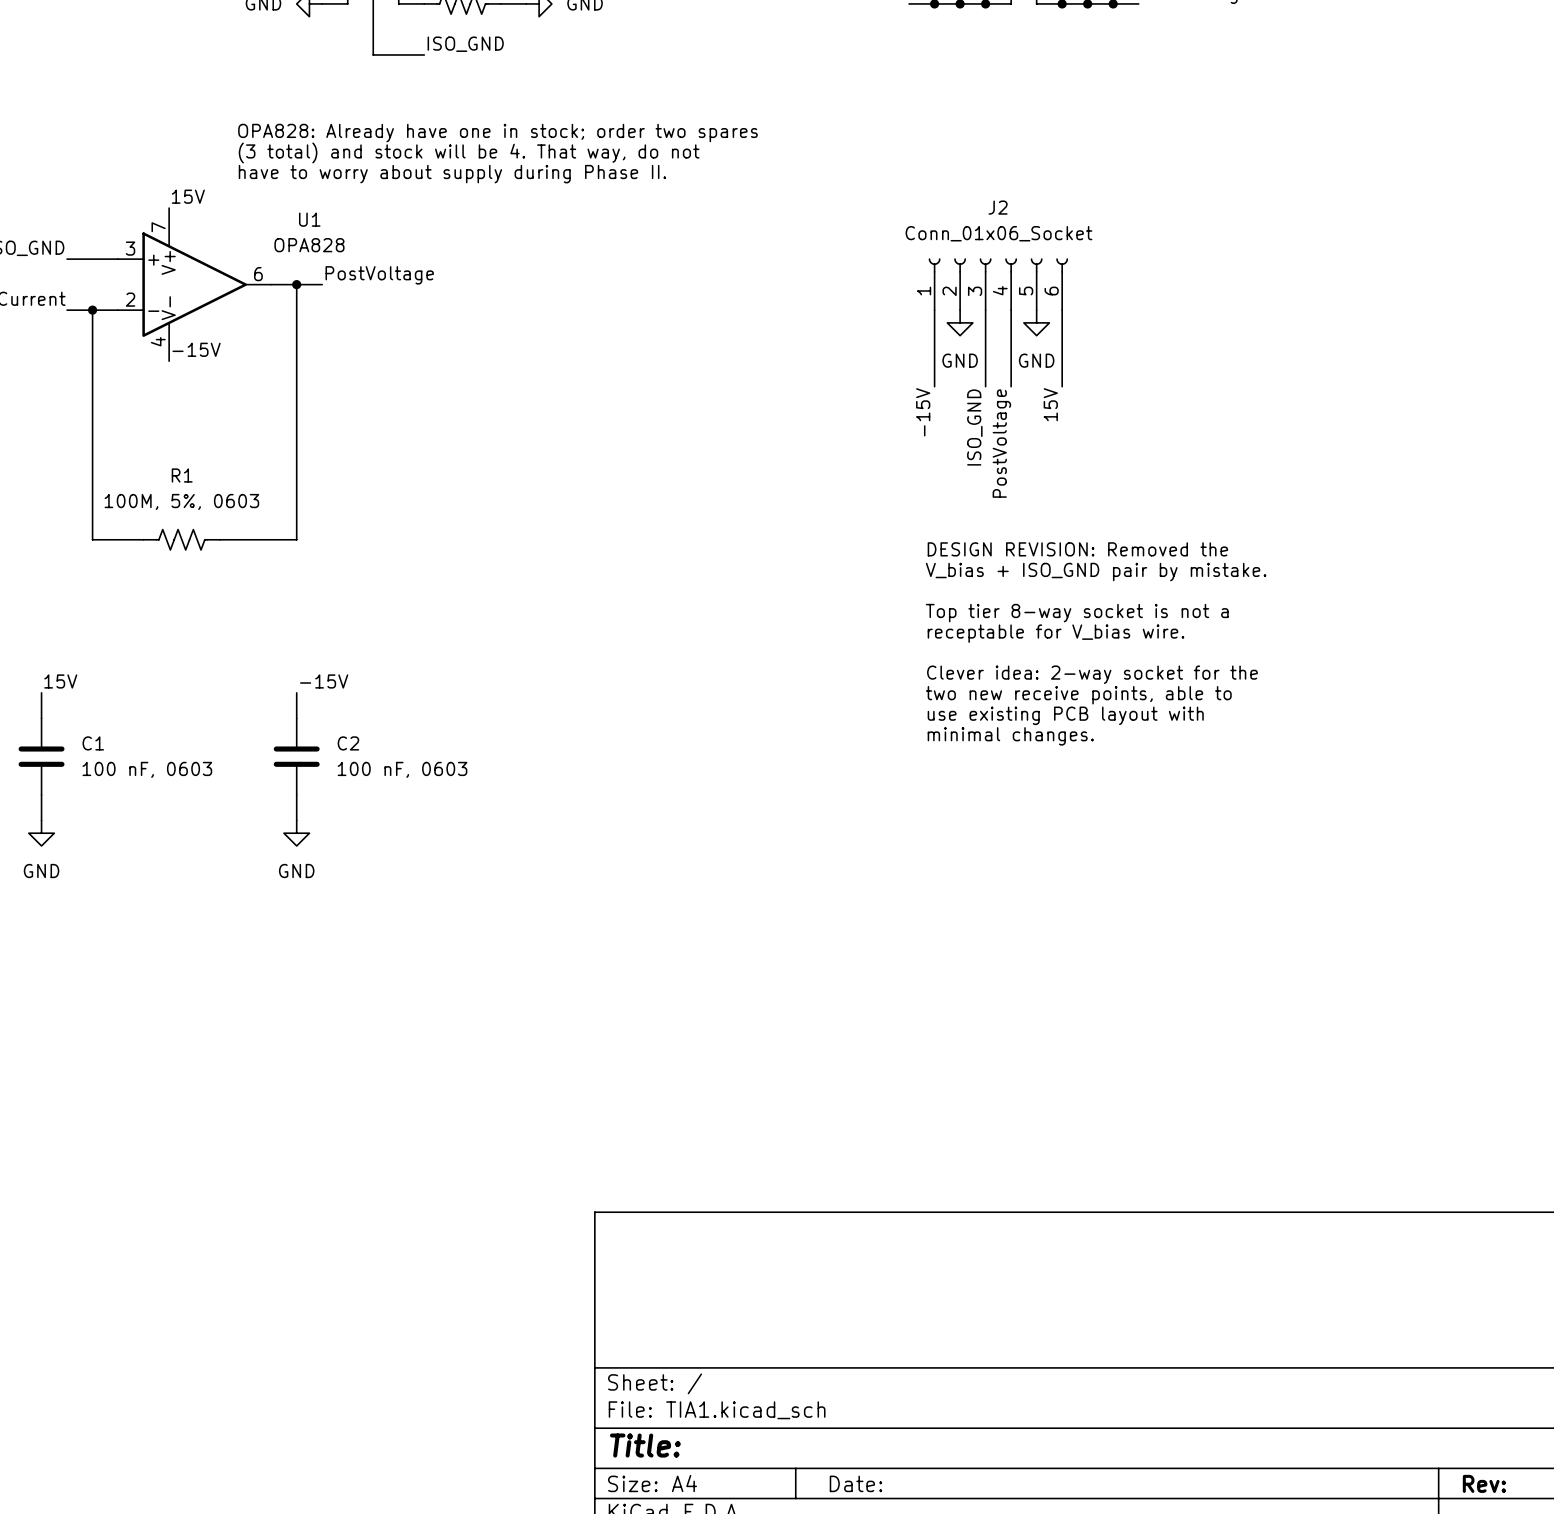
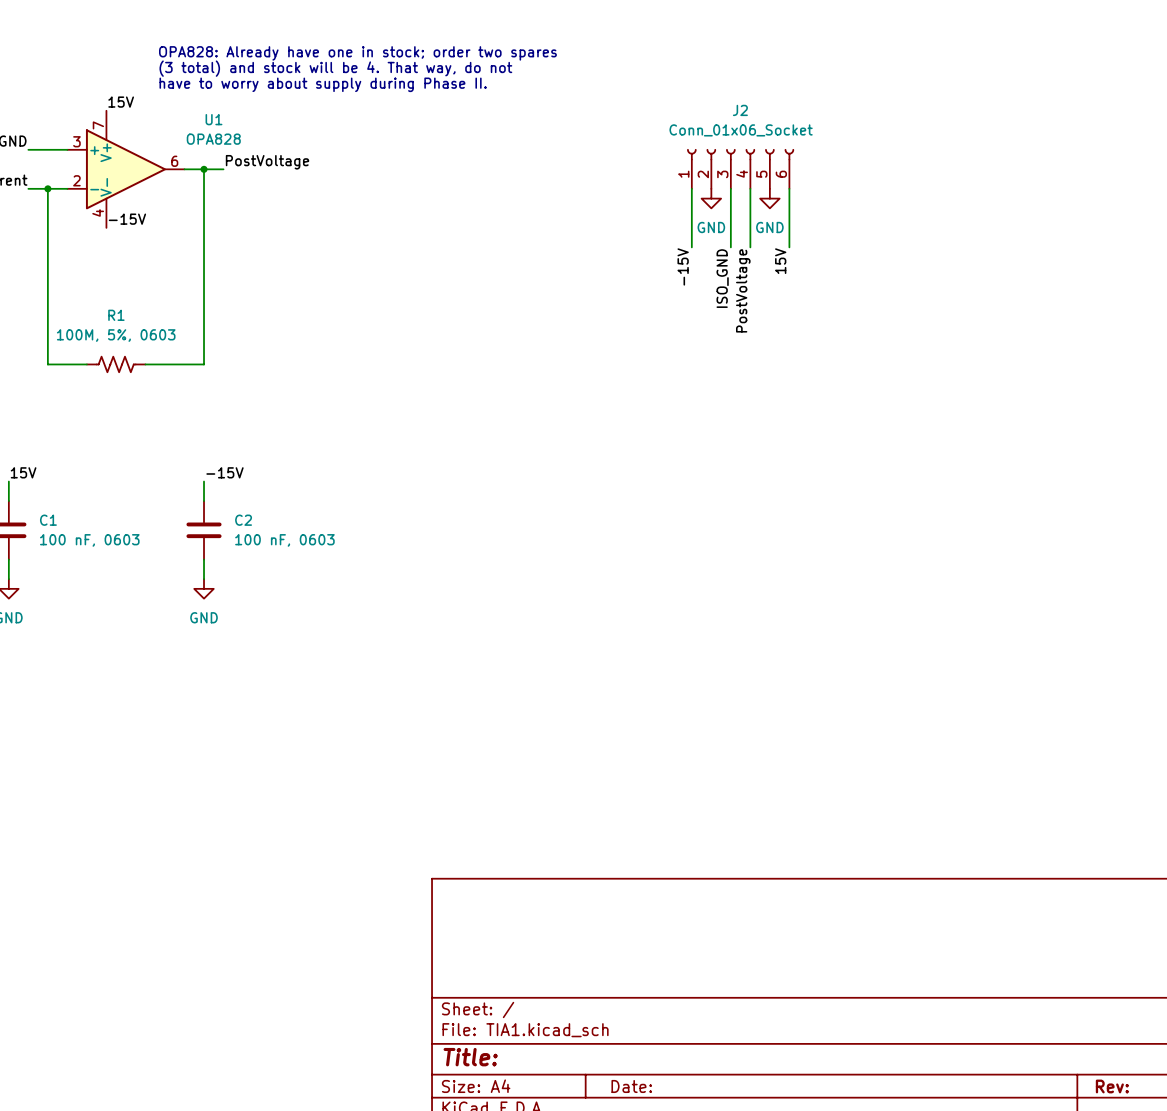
text: DESIGN REVISION: Removed the (1077, 549) -> none
text: V_bias + ISO_GND pair by mistake. (1096, 572) -> none
text: Top tier 8-way socket is not a (1077, 613) -> none
text: receptable for V_bias wire. (1056, 633) -> none
text: Clever idea: 2-way socket for the (1092, 674) -> none
text: two new receive points, able to (1078, 695) -> none
text: use existing PCB layout with (1065, 715) -> none
text: minimal changes. (1010, 736) -> none

